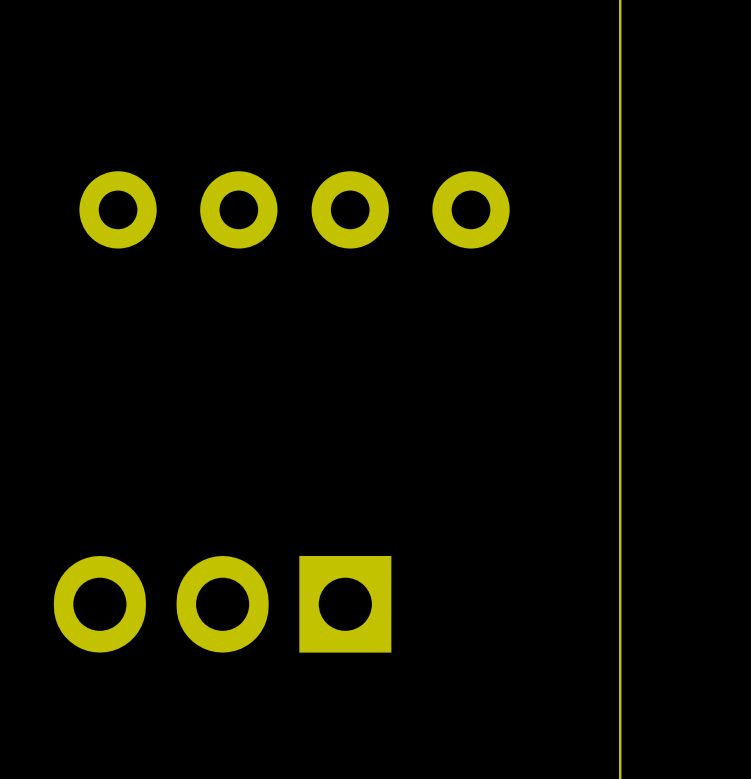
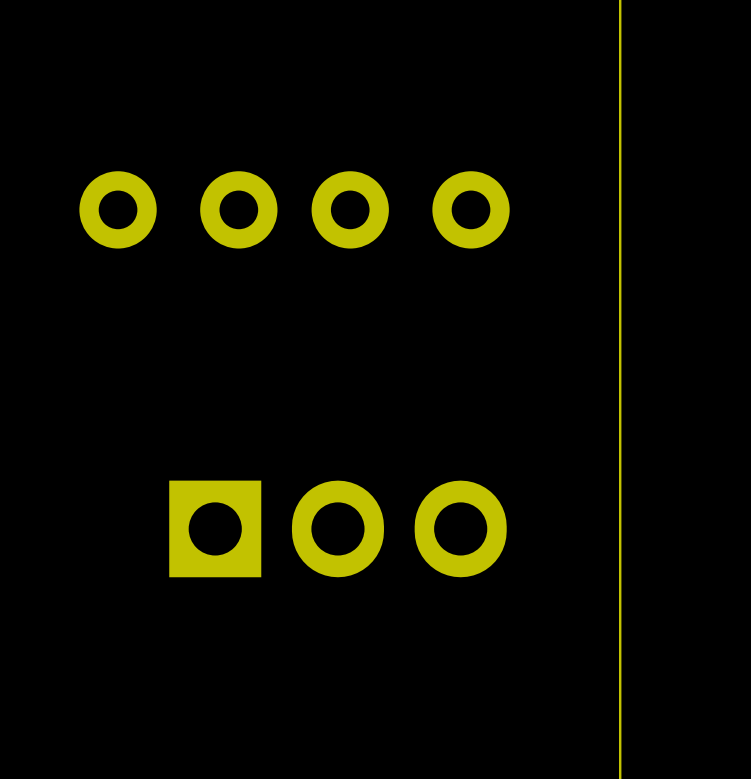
part rotation: 0° (222, 604) -> 180° (337, 528)

